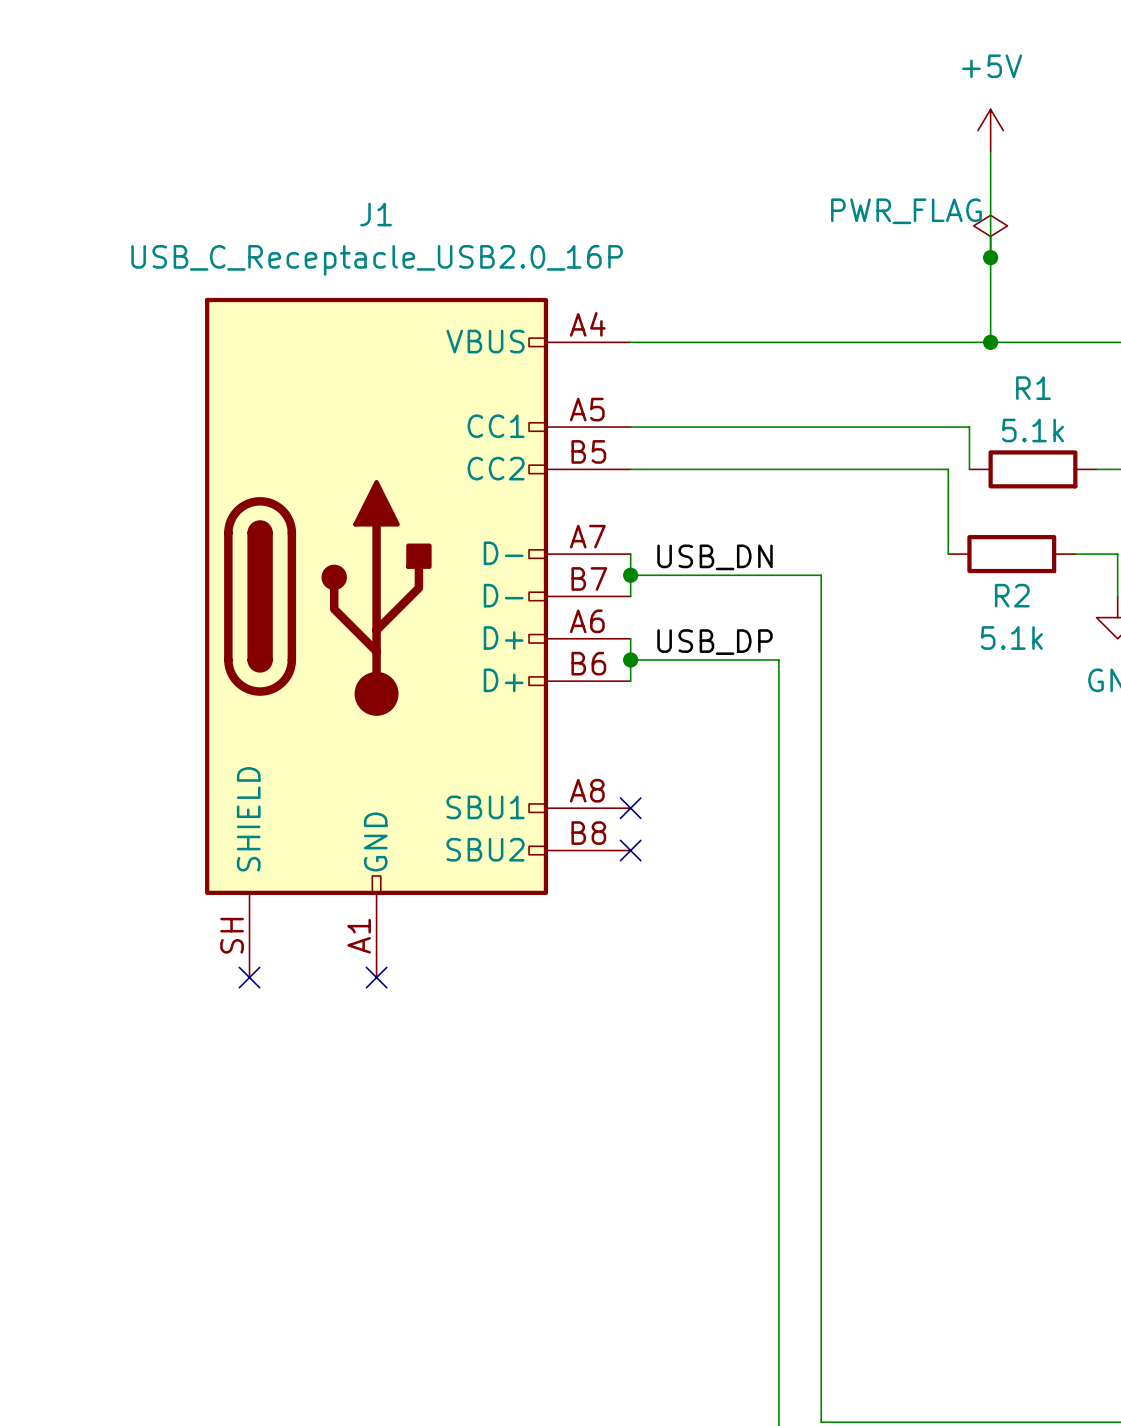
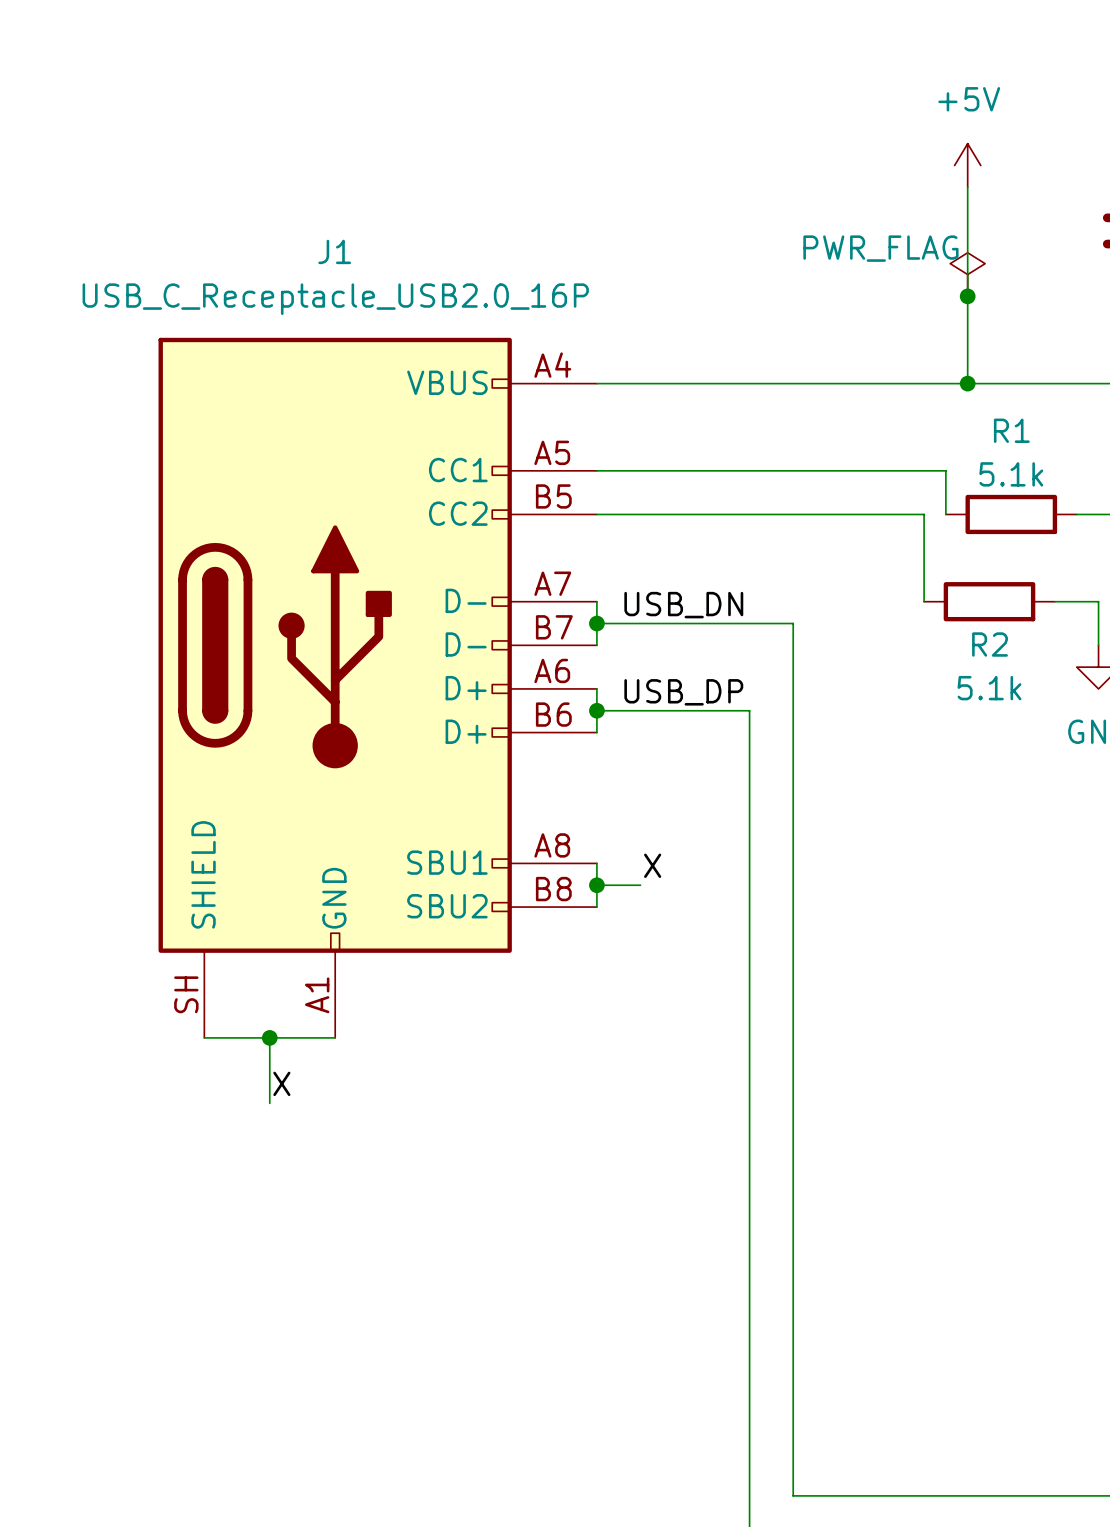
wire: none -> (596, 863) (596, 907)
no-connect mark: (630, 808) -> none
label: none -> X (652, 865)
wire: none -> (596, 885) (640, 885)
junction: none -> (596, 885)
no-connect mark: (630, 850) -> none
wire: none -> (204, 1037) (335, 1037)
no-connect mark: (249, 977) -> none
wire: none -> (269, 1037) (269, 1103)
junction: none -> (269, 1037)
no-connect mark: (376, 977) -> none
label: none -> X (281, 1083)

